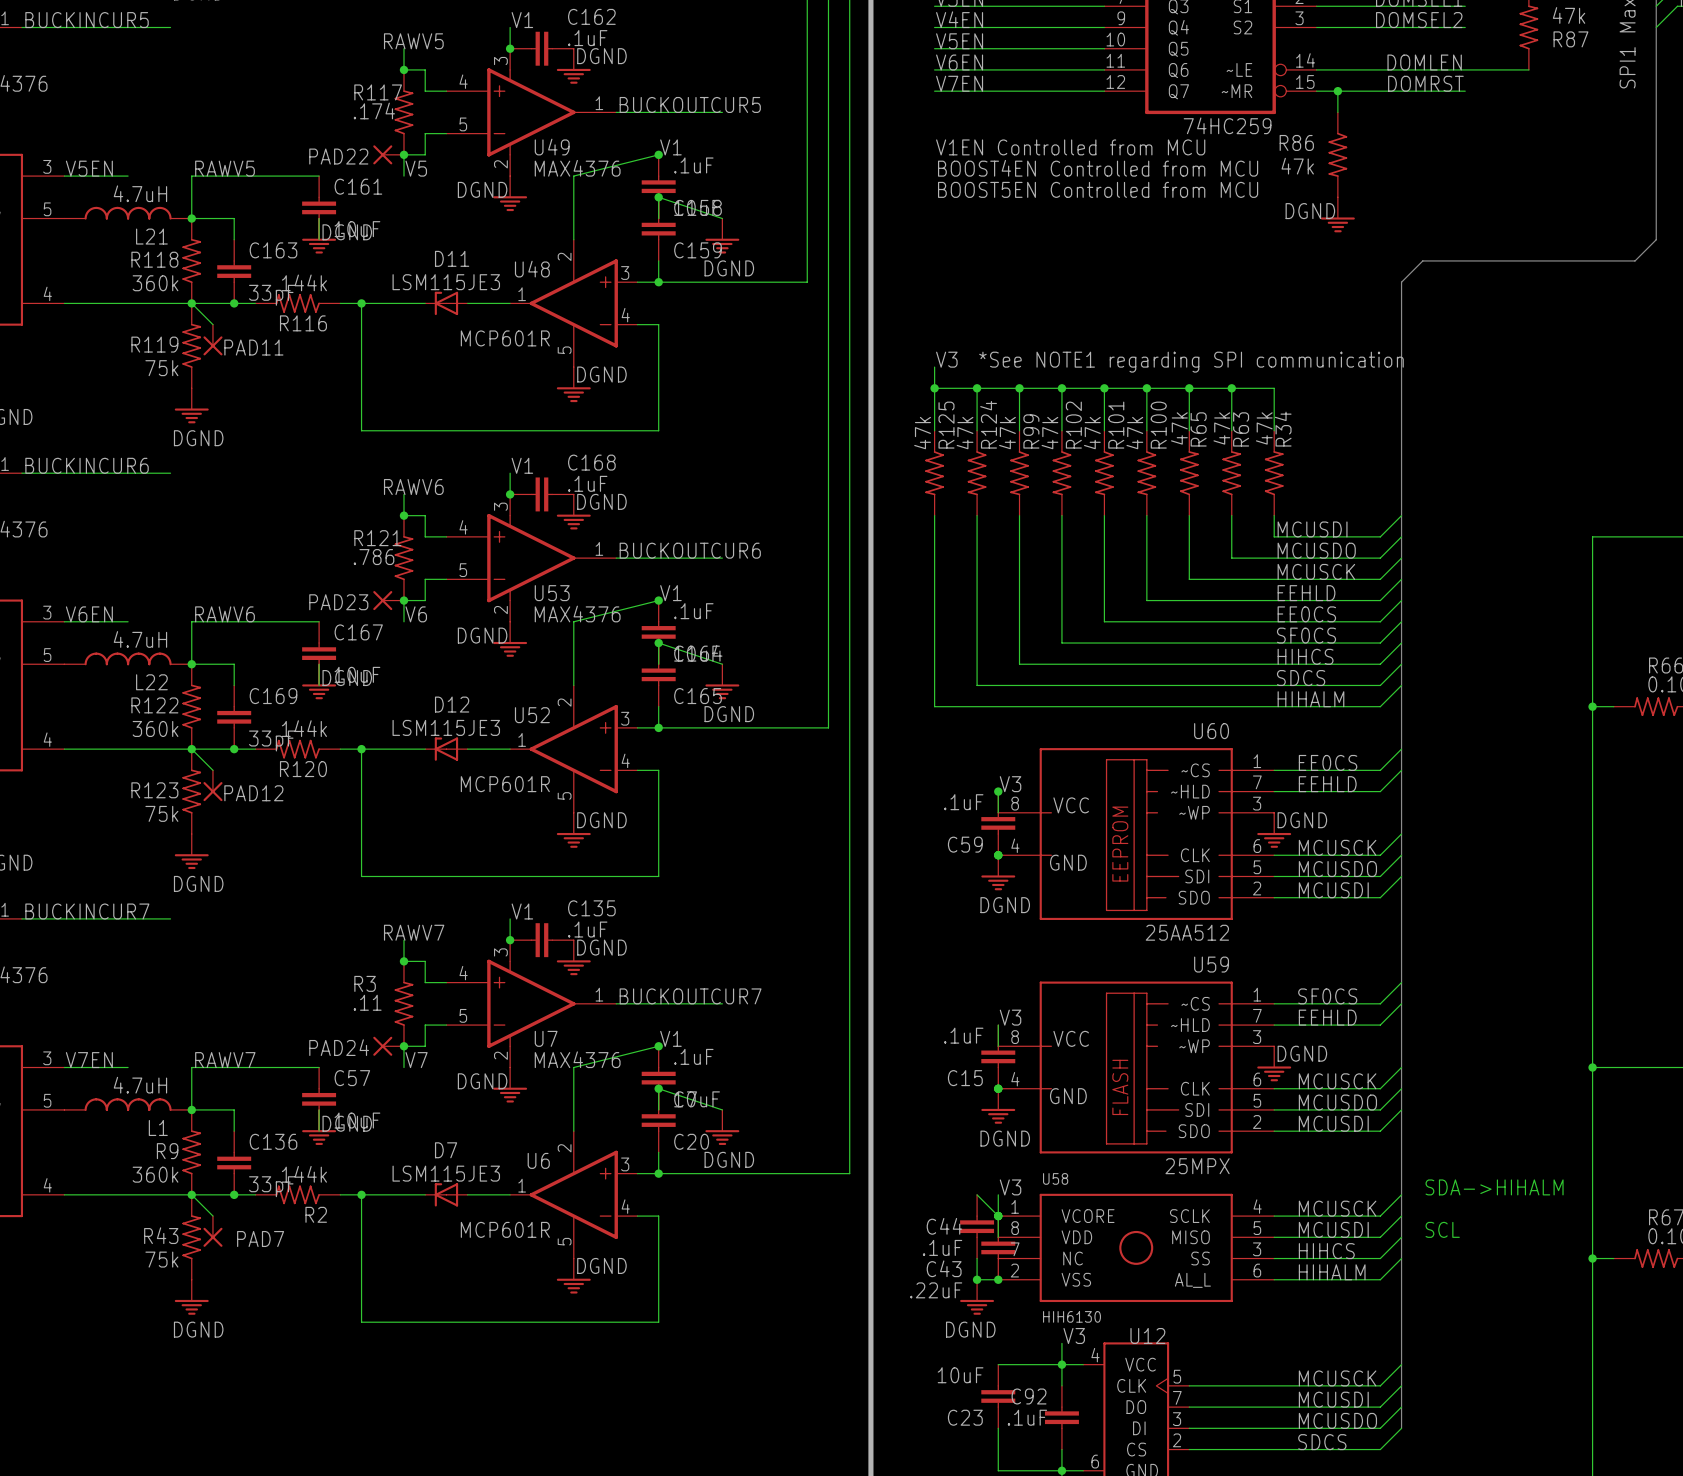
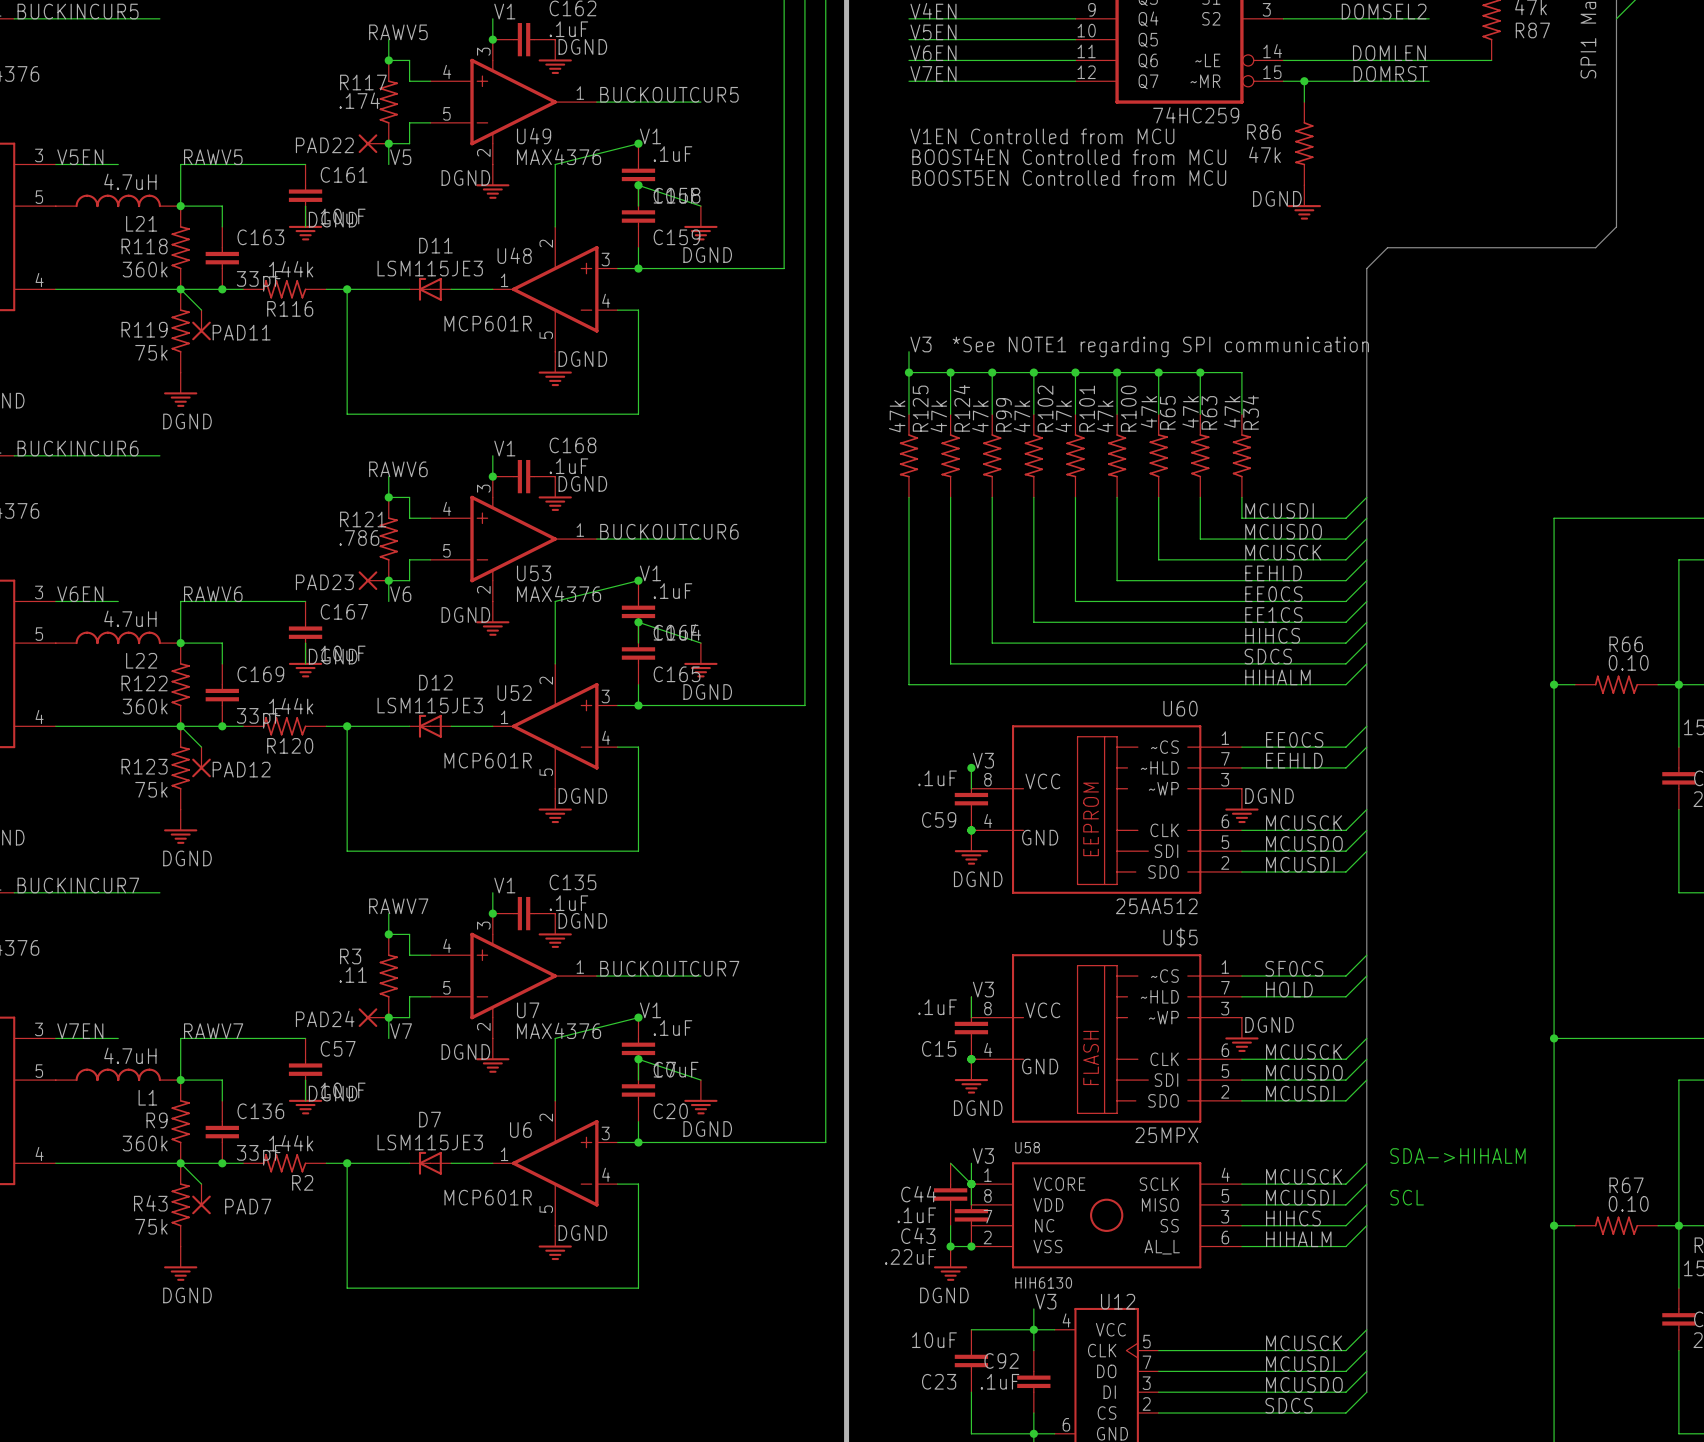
label: SF0CS (1306, 635) -> EE1CS (1273, 614)
U59 name: U59 (1211, 964) -> U$5 (1180, 937)
label: EEHLD (1327, 1017) -> HOLD (1289, 989)

